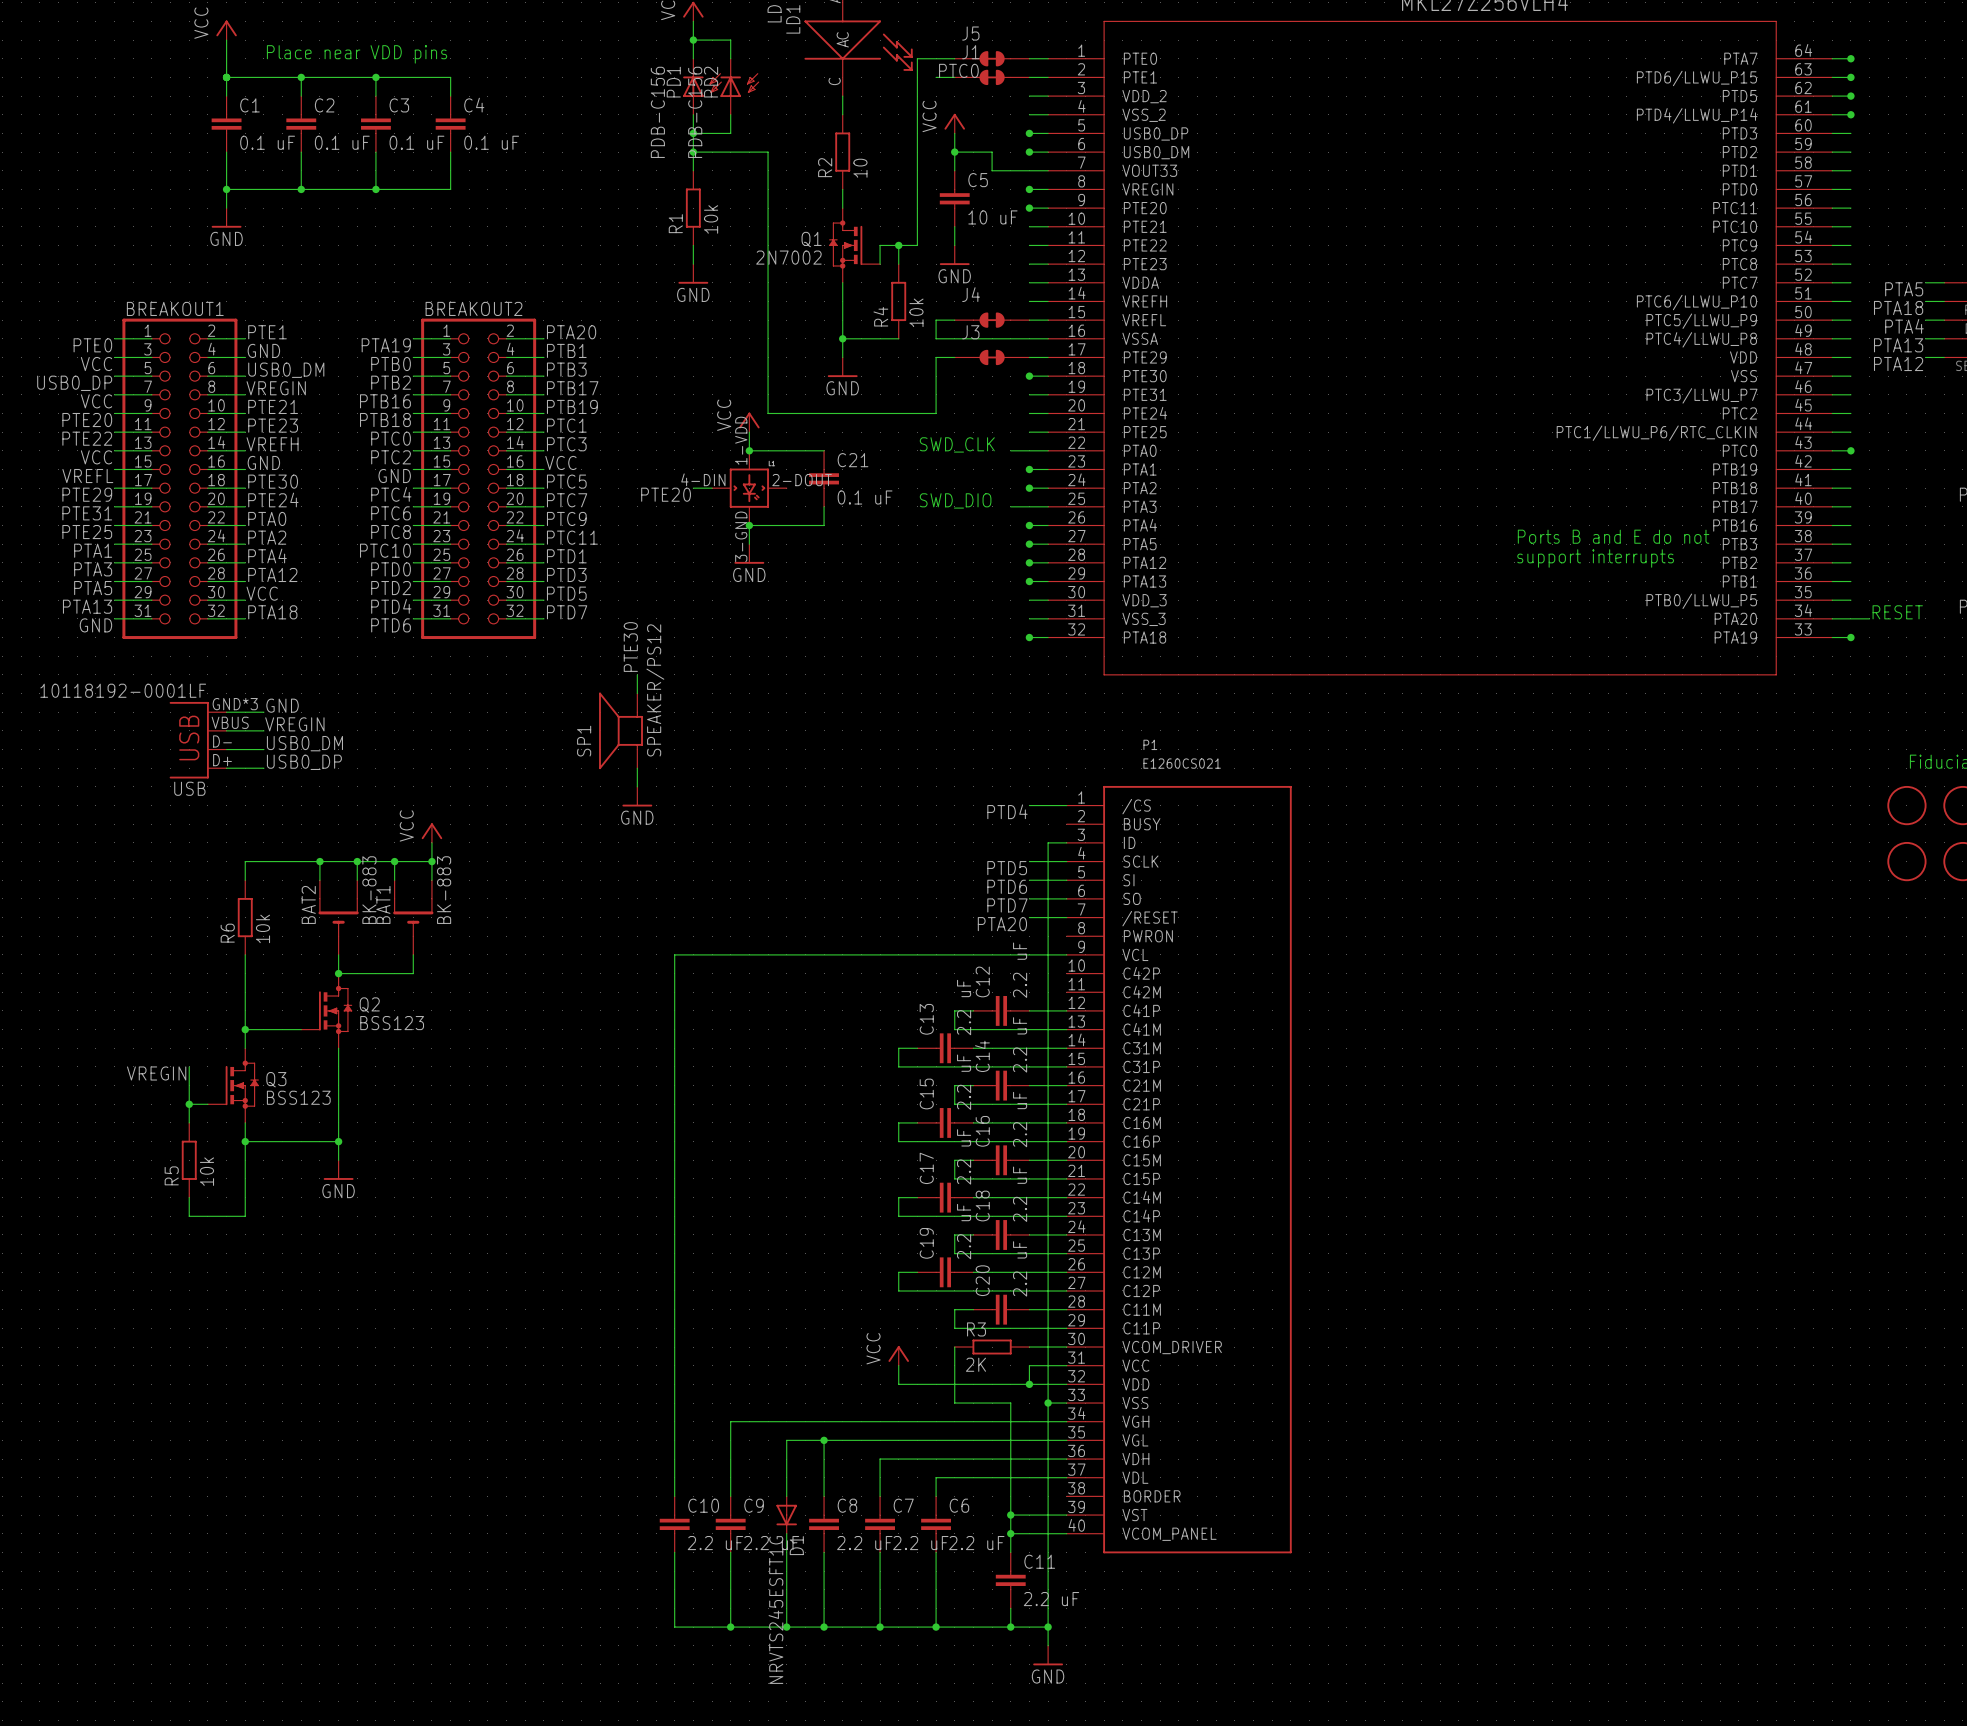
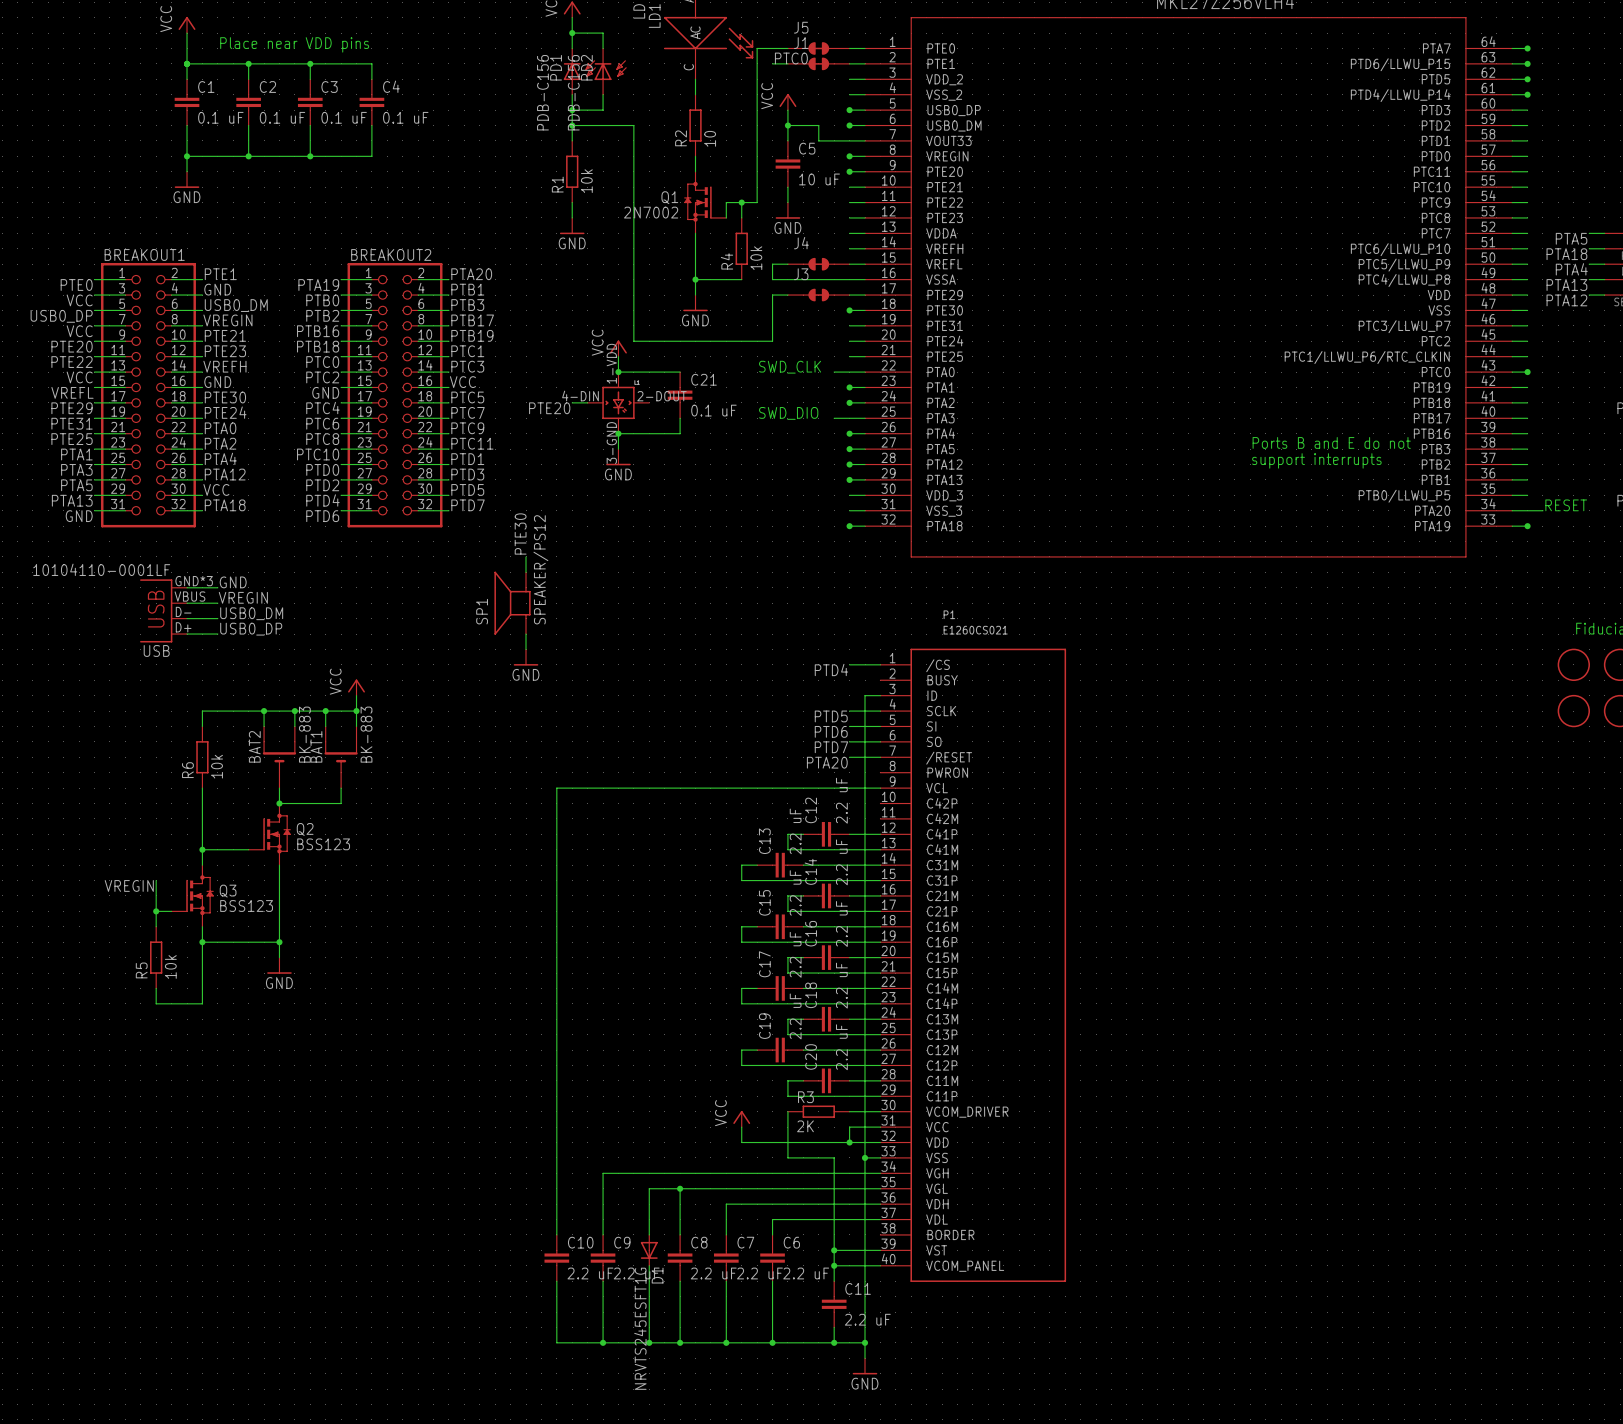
USB value: 10118192-0001LF (123, 690) -> 10104110-0001LF (101, 569)

